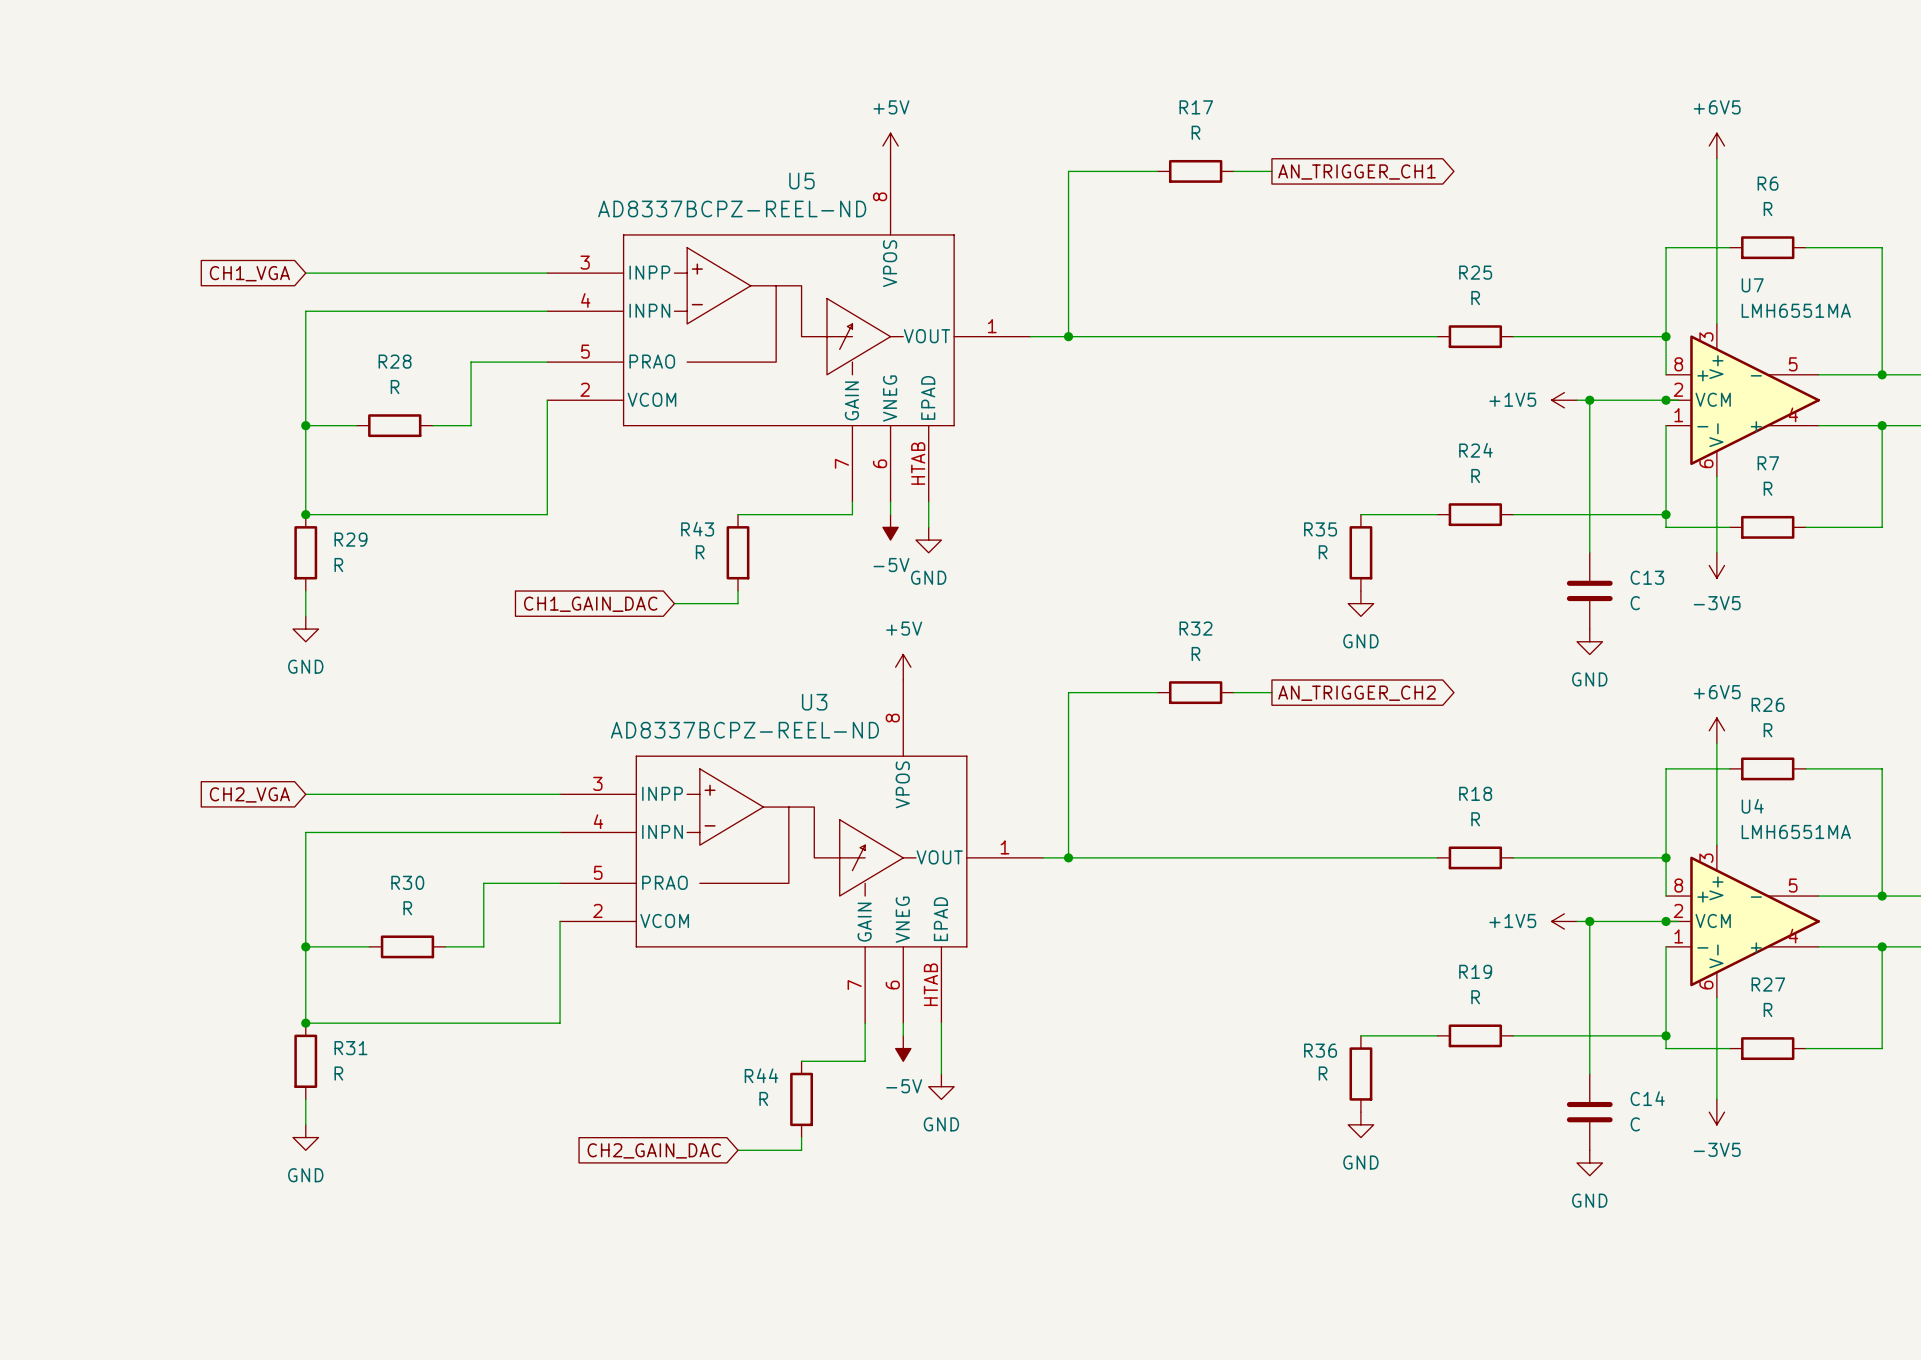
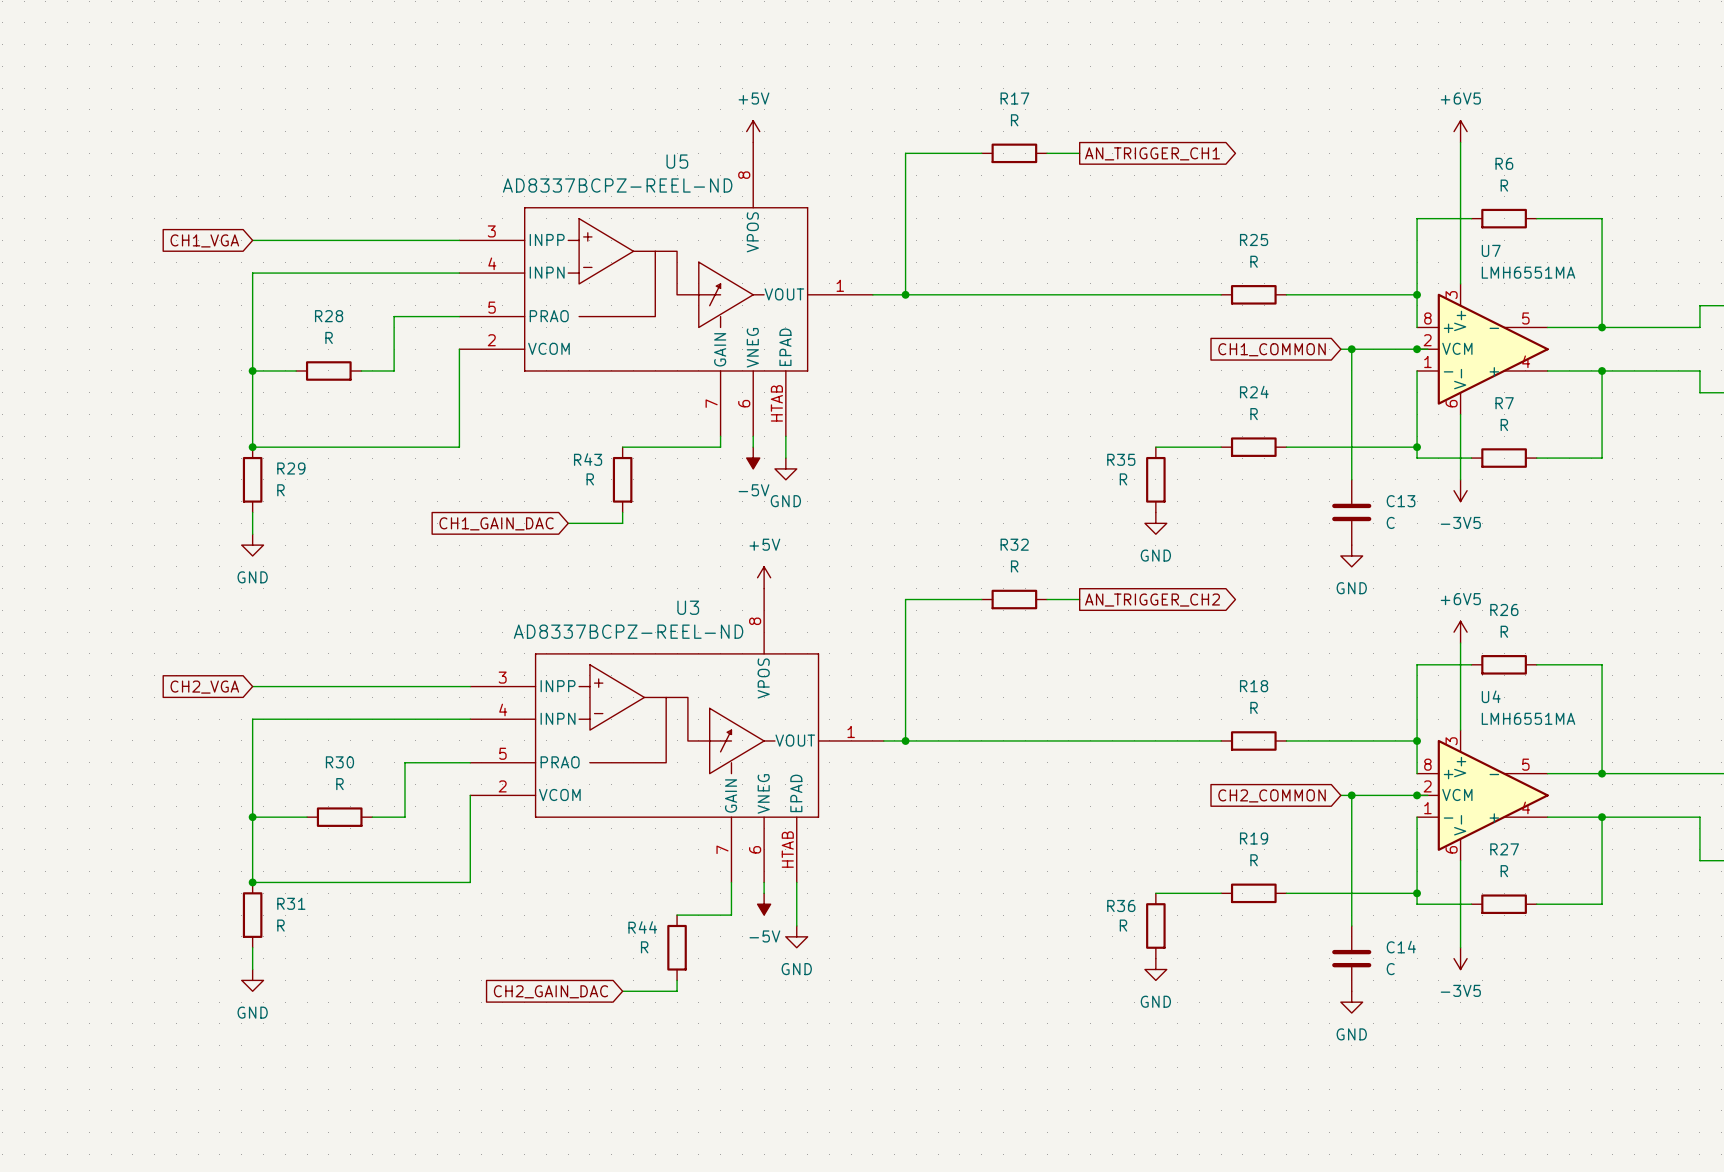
global label: none -> CH1_COMMON (1272, 349)
power symbol: +1V5 (1564, 400) -> none
power symbol: +1V5 (1564, 921) -> none
global label: none -> CH2_COMMON (1272, 795)

